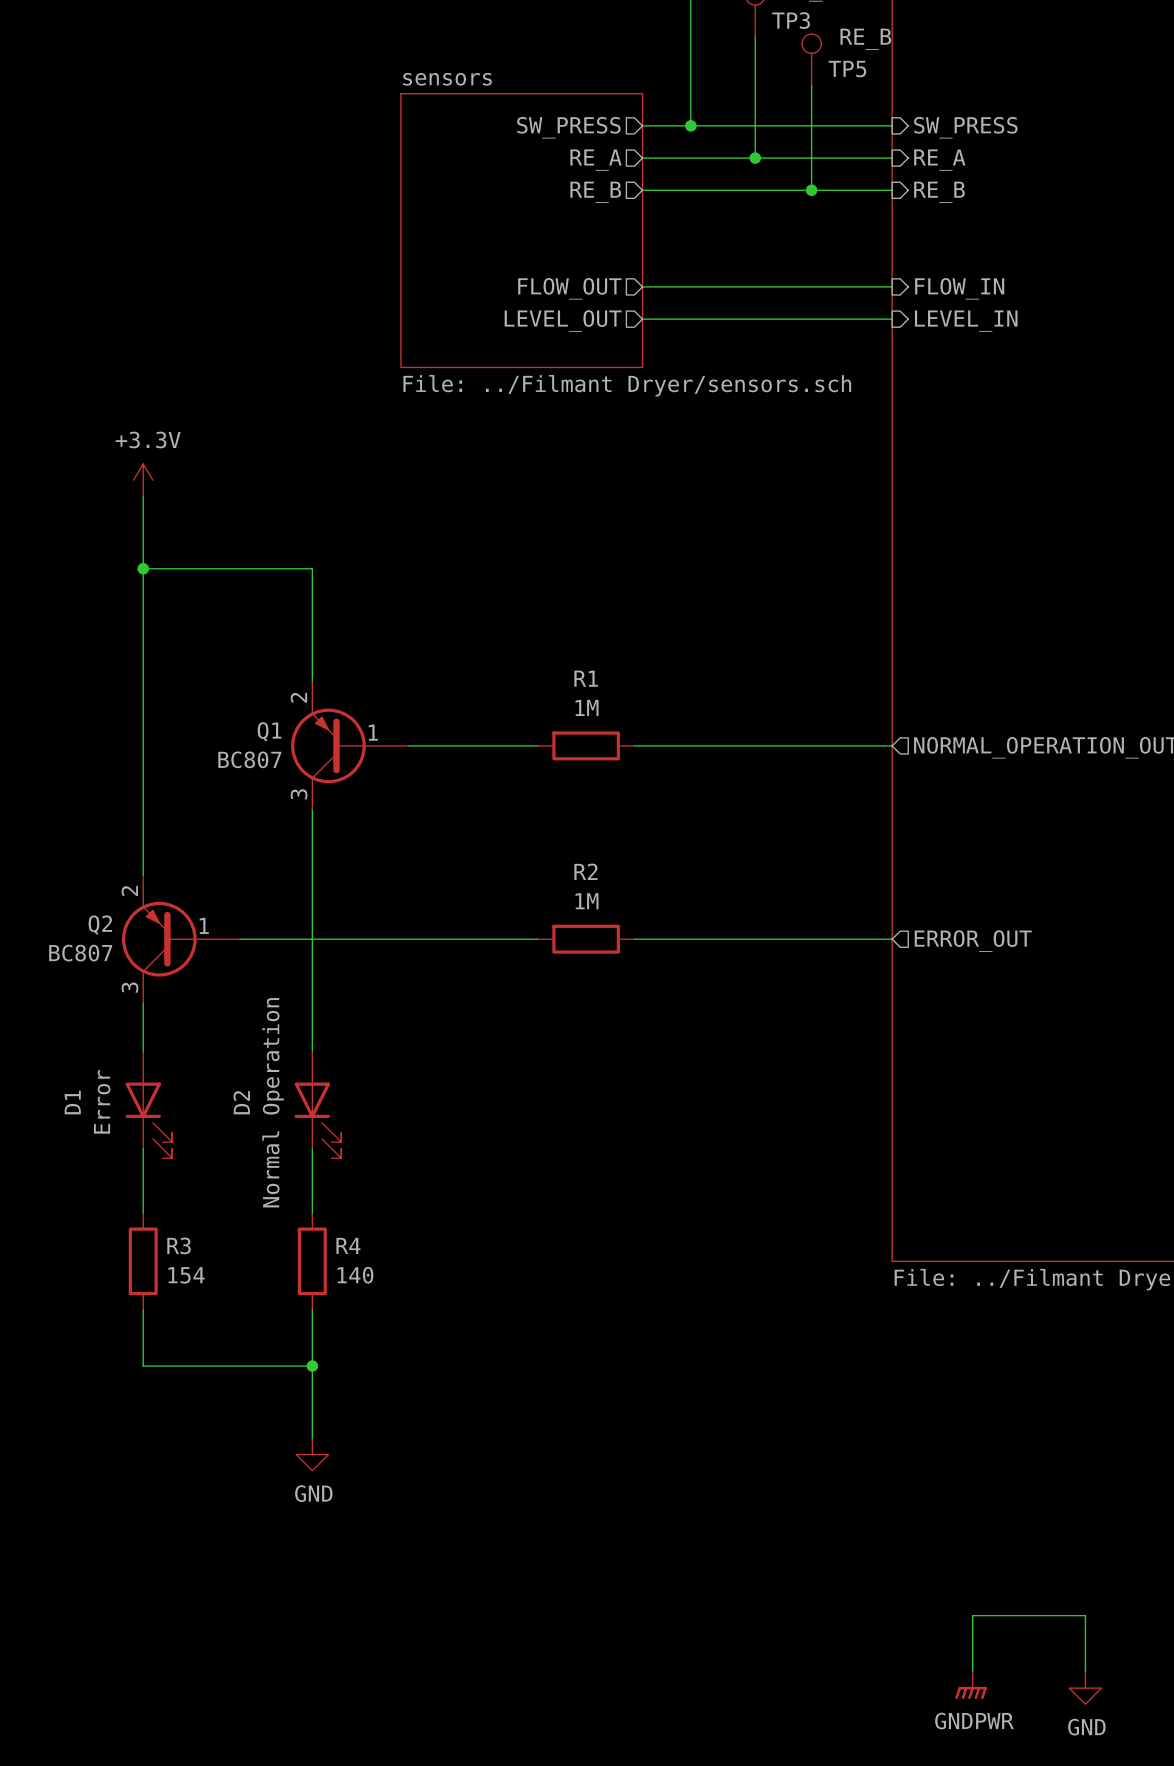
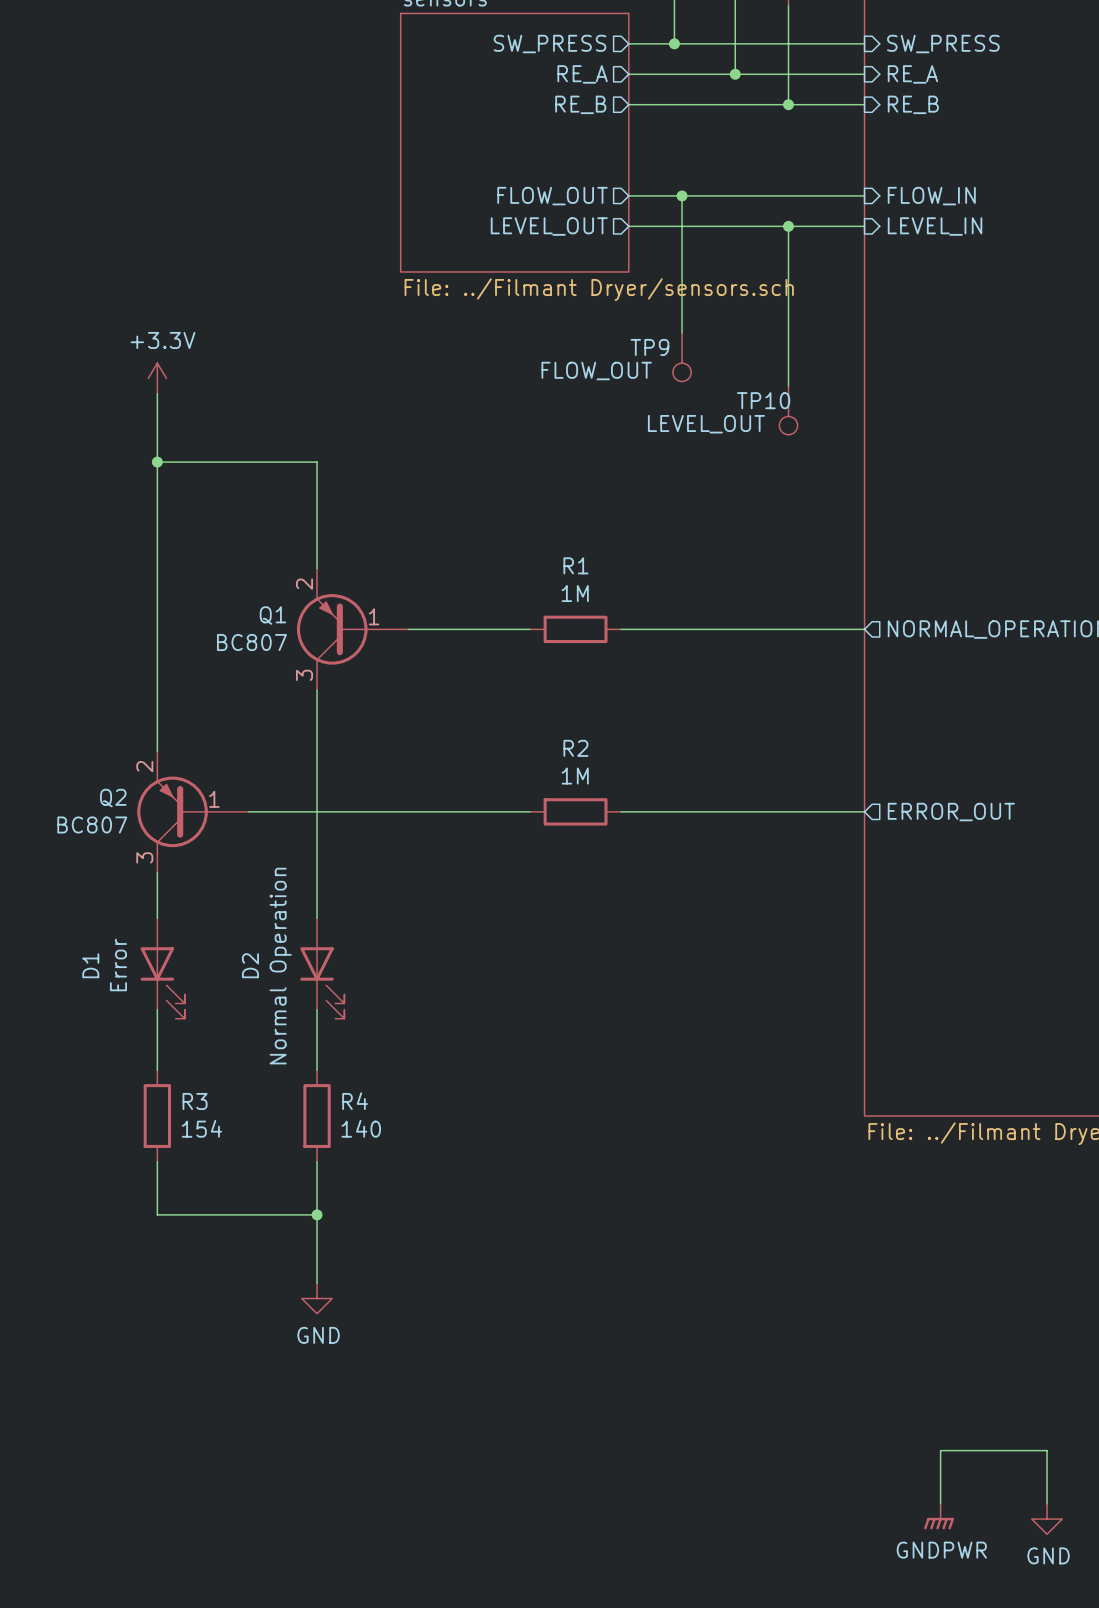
wire: none -> (682, 195) (682, 332)
junction: none -> (682, 195)
wire: none -> (788, 226) (788, 386)
junction: none -> (788, 226)
TP9: none -> FLOW_OUT (682, 357)
TP10: none -> LEVEL_OUT (788, 410)

